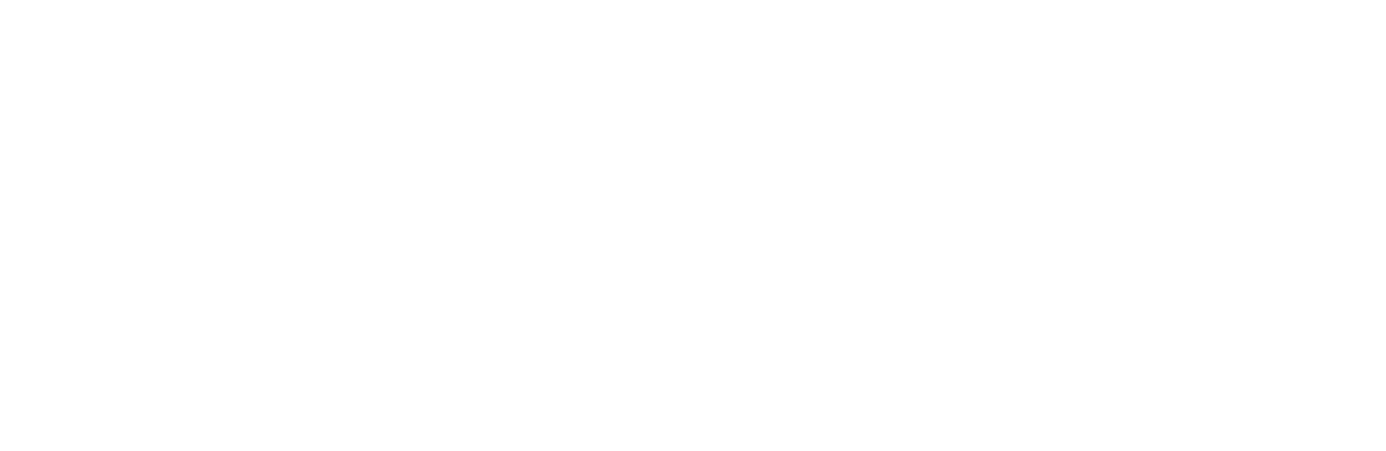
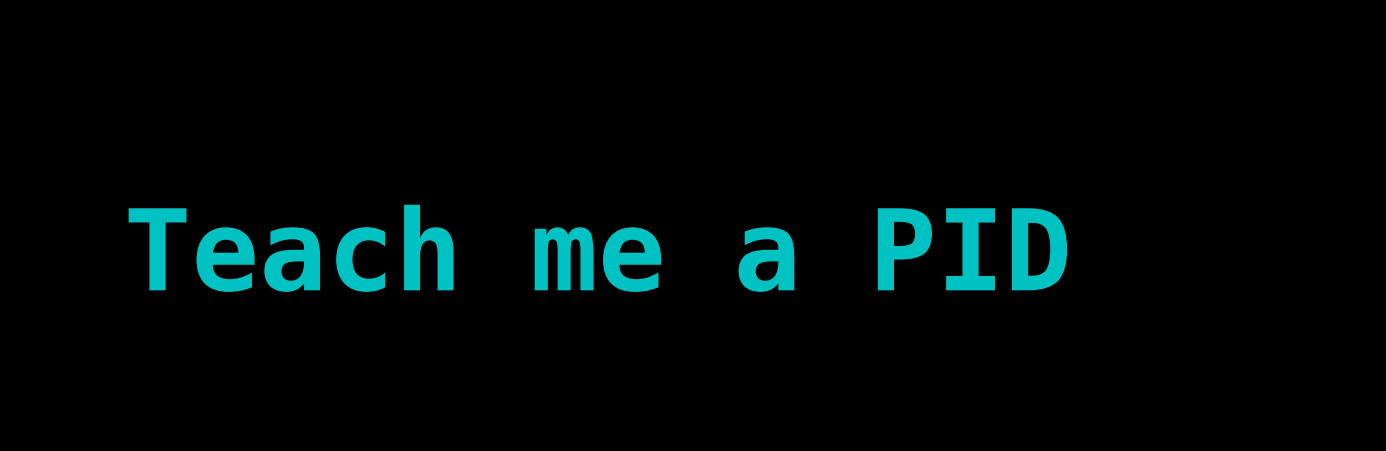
text: none -> Teach me a PID (597, 248)

